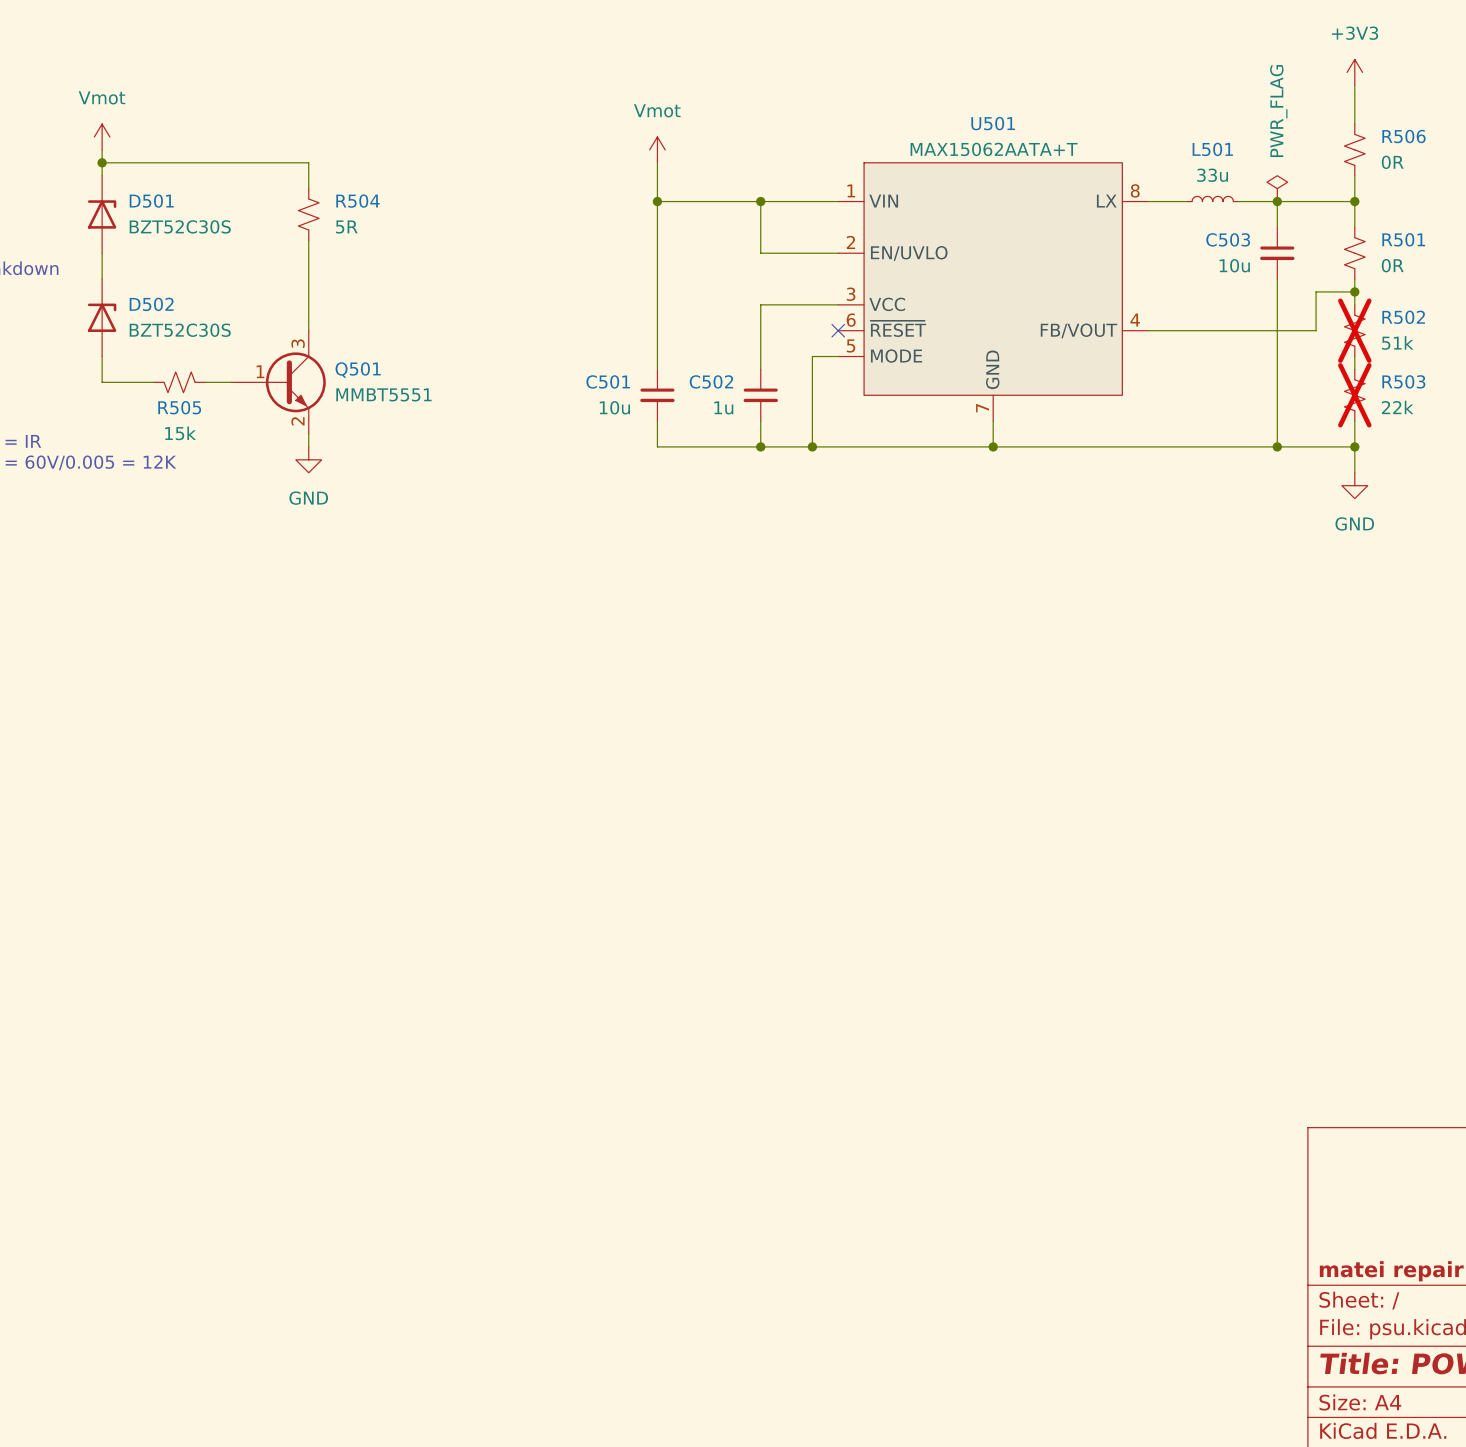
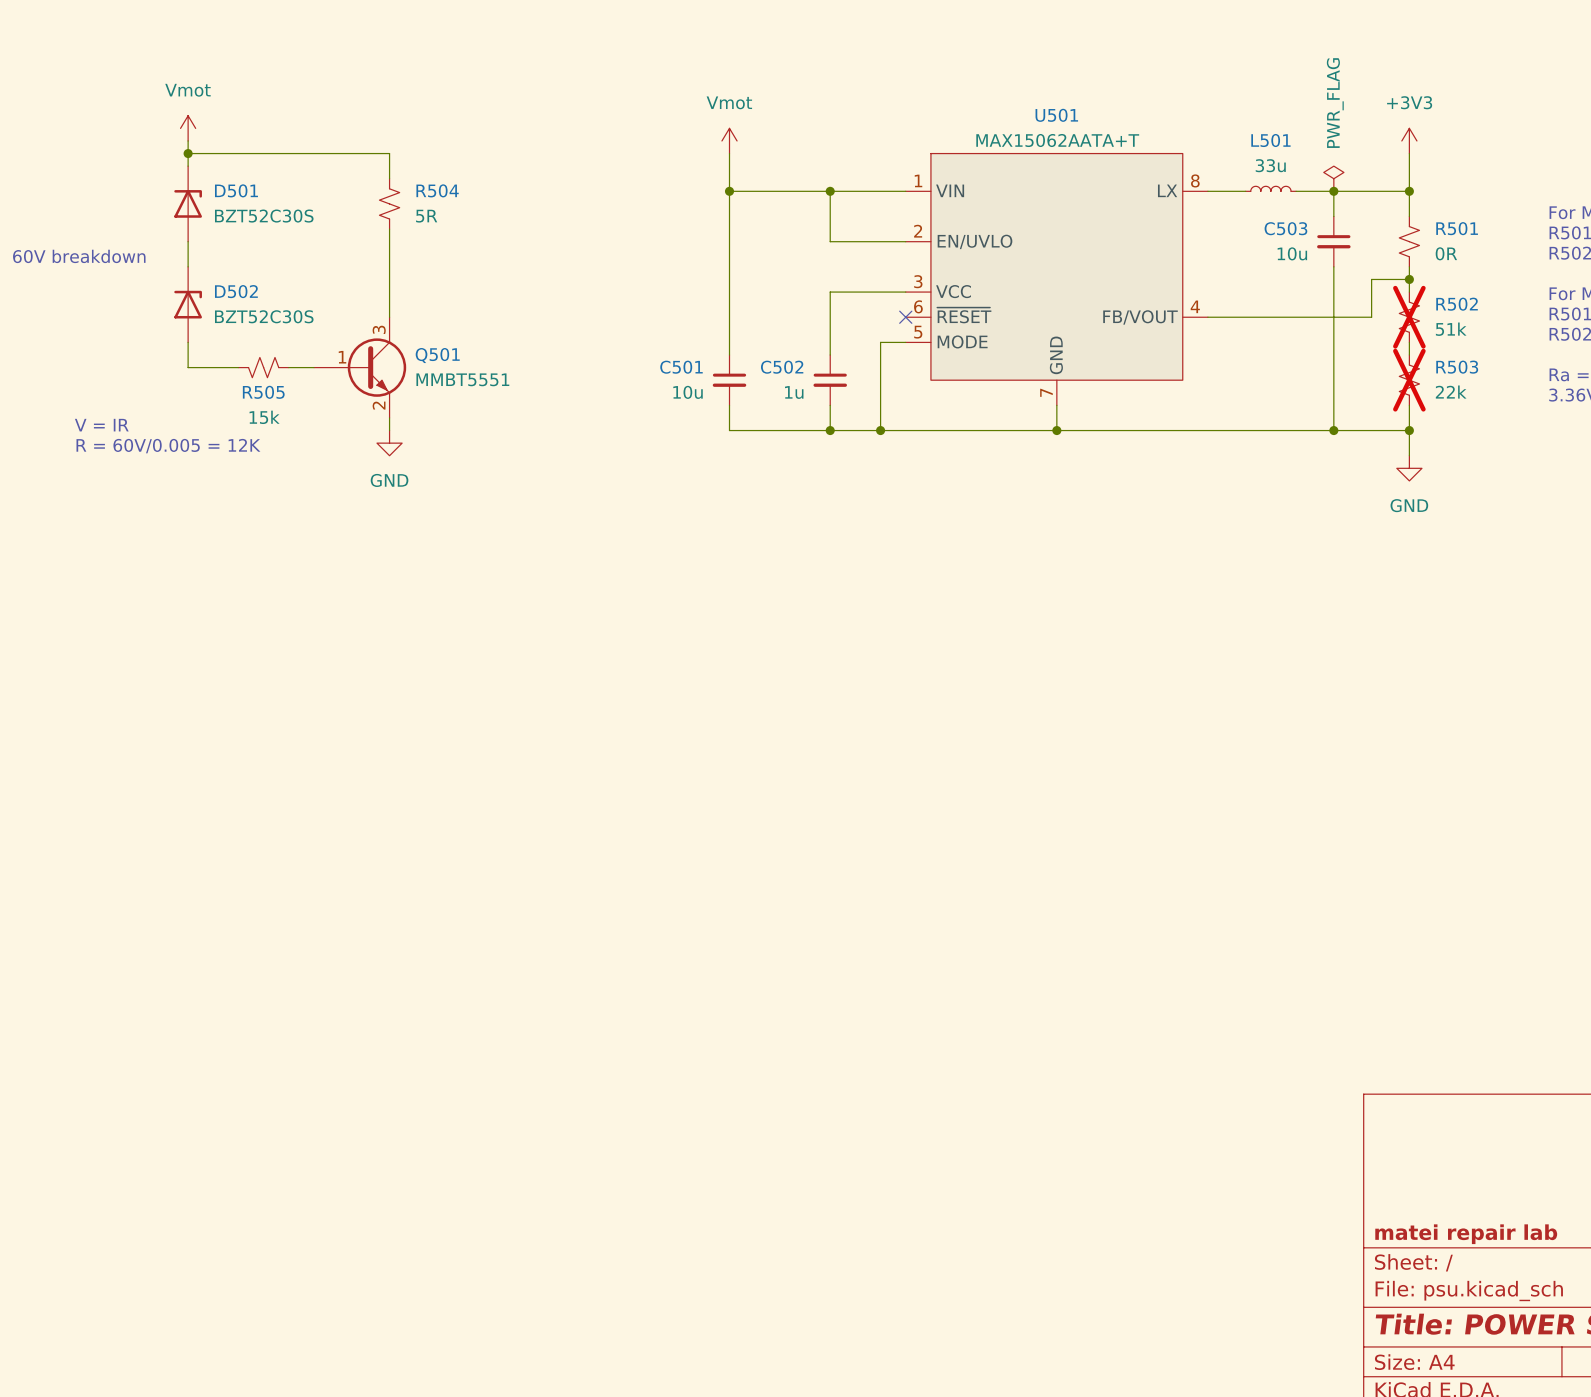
power symbol position: +3V3 (1354, 72) -> +3V3 (1409, 140)
wire: (1354, 85) (1354, 124) -> none
R506: 0R (1354, 149) -> none

